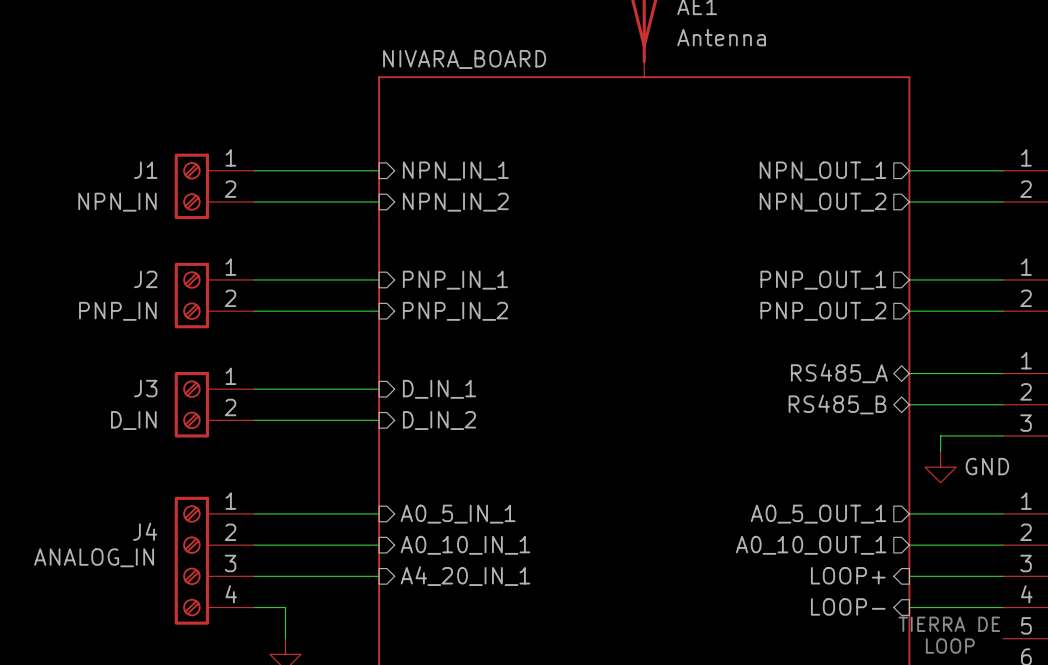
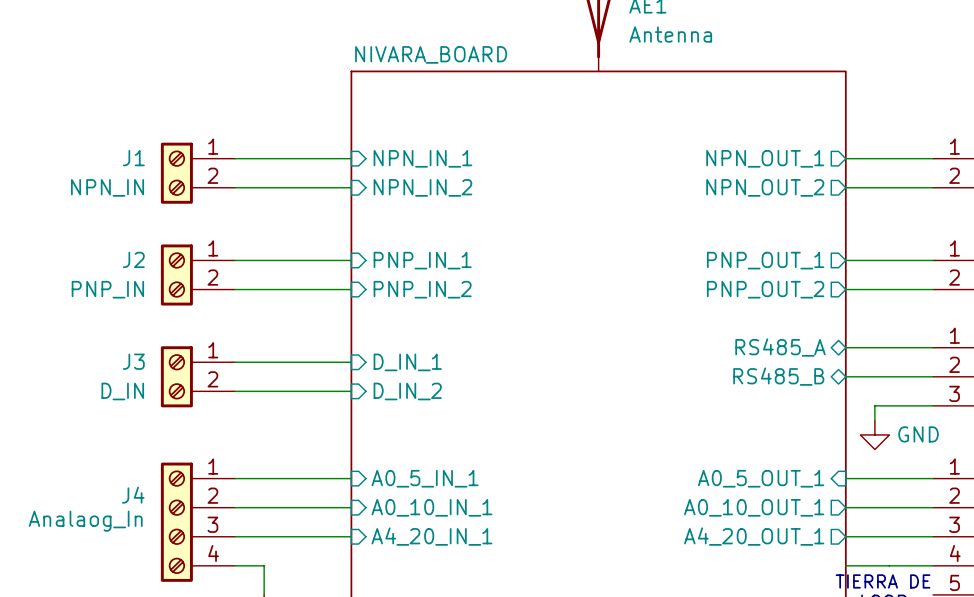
sheet pin shape: output (818, 514) -> input (761, 478)
J4 value: ANALOG_IN (94, 557) -> Analaog_In (85, 521)
sheet pin shape: input (848, 575) -> output (754, 536)
sheet pin: LOOP+ (848, 575) -> A4_20_OUT_1 (754, 536)
sheet pin: LOOP- (848, 606) -> none

